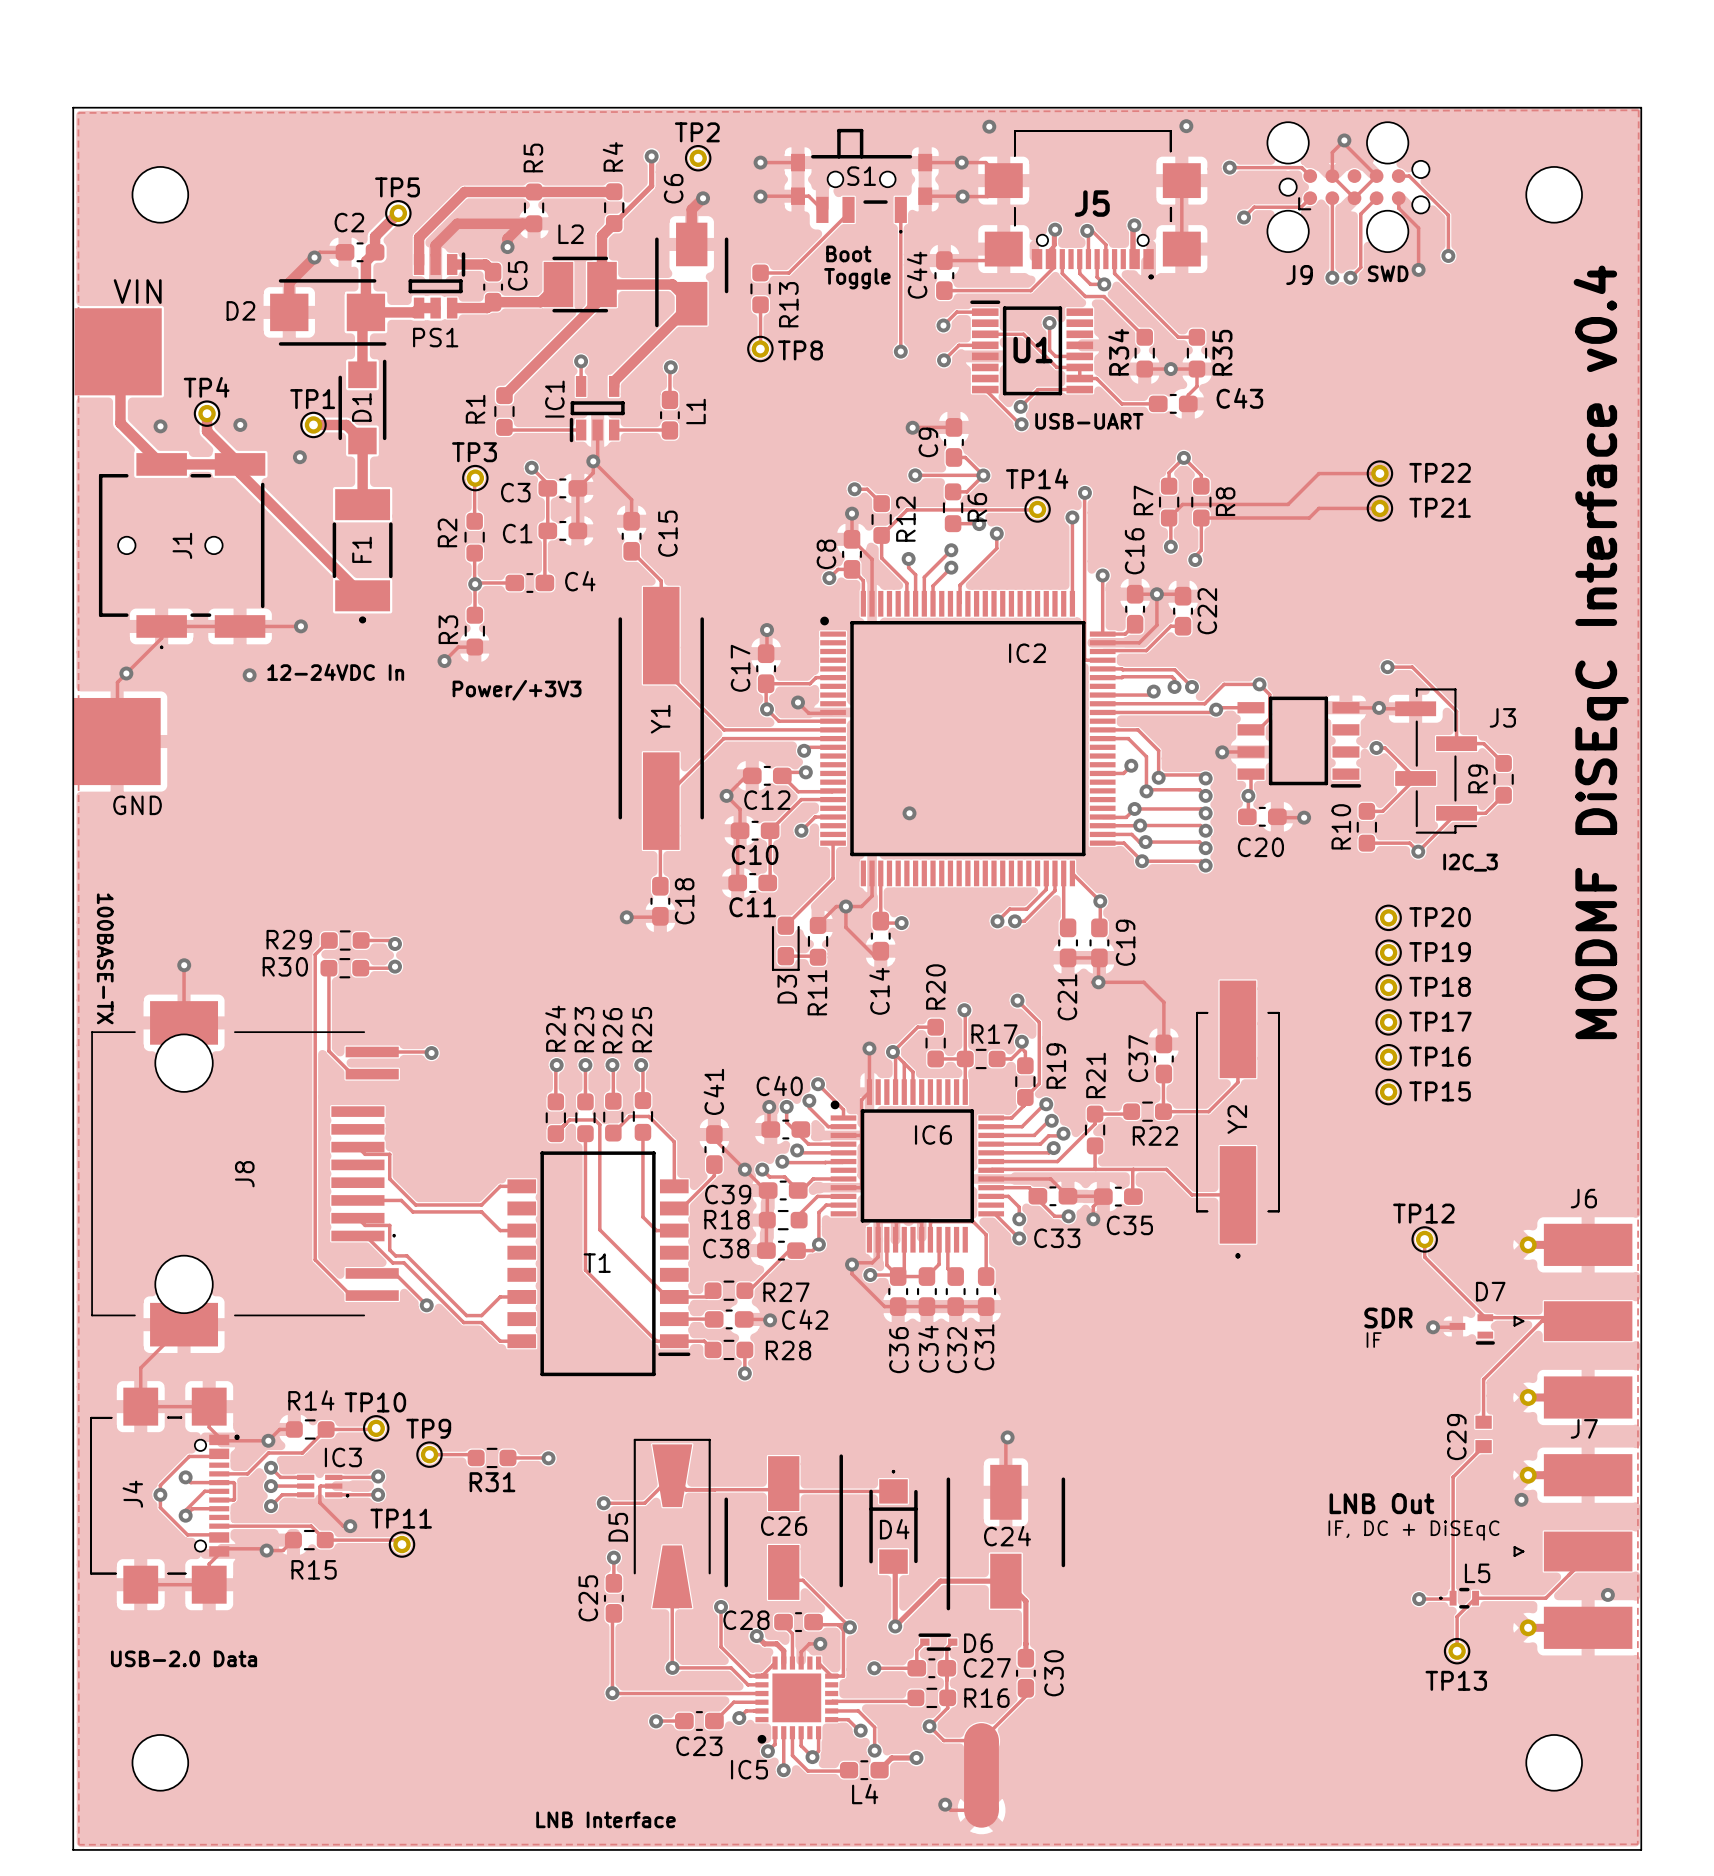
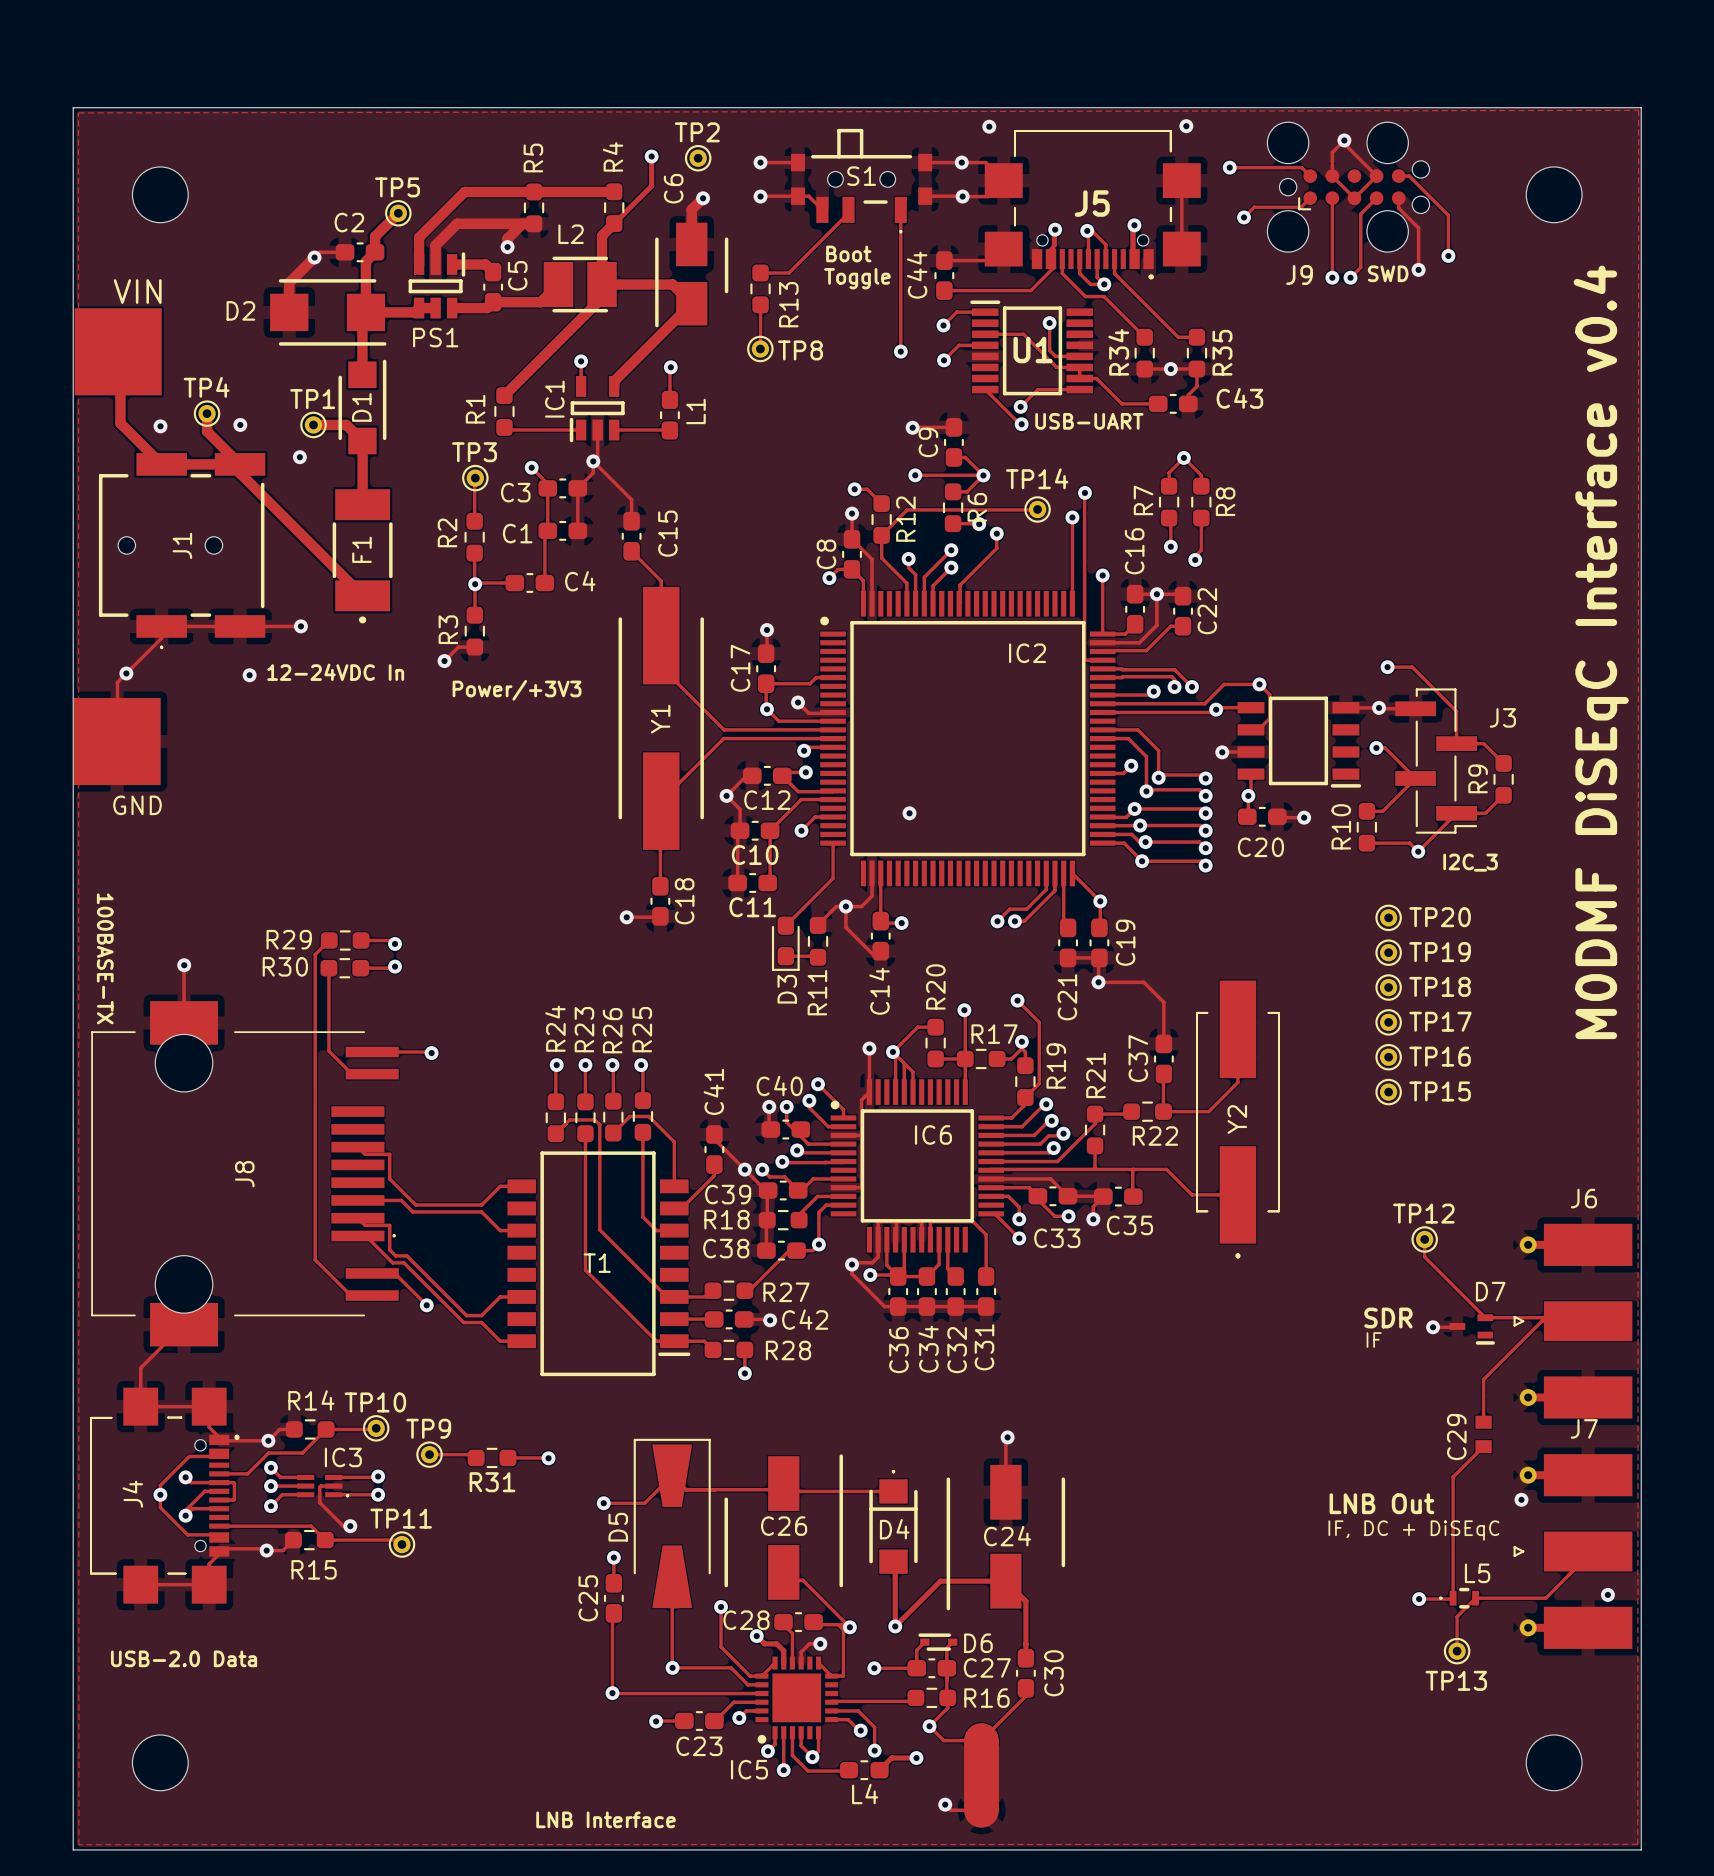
track: (1379, 473) (1318, 473) (1288, 504) (1182, 504) (1169, 518) -> none
TP22: (1379, 473) -> none
track: (1379, 508) (1318, 508) (1309, 518) (1201, 518) -> none
TP21: (1379, 508) -> none

